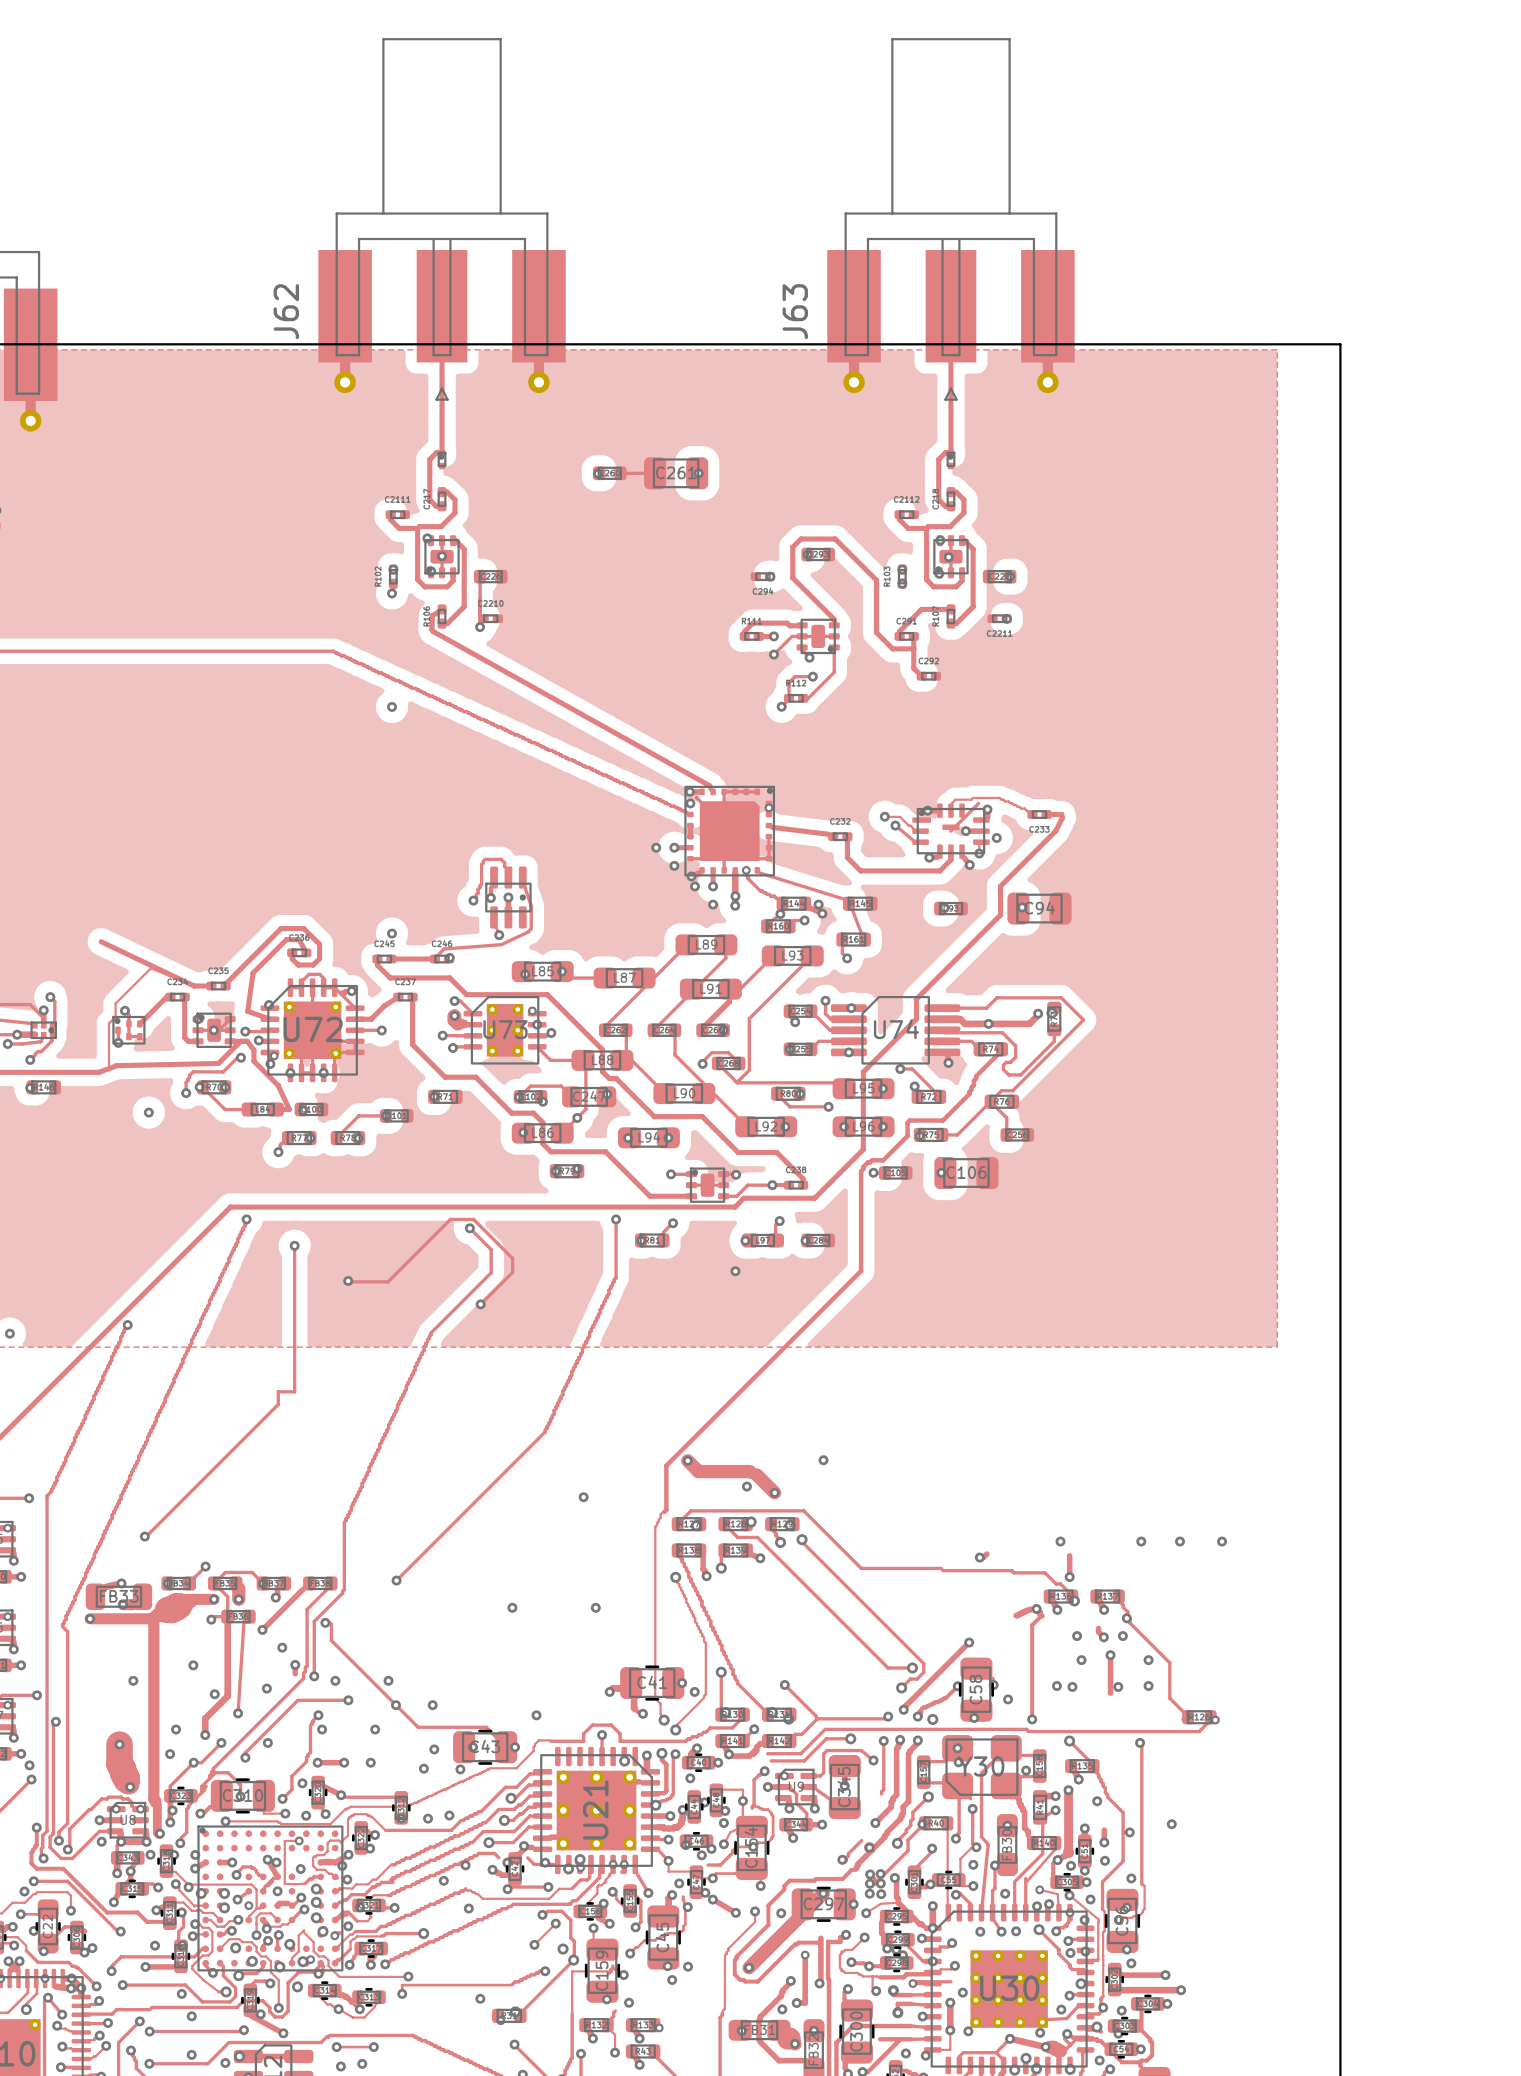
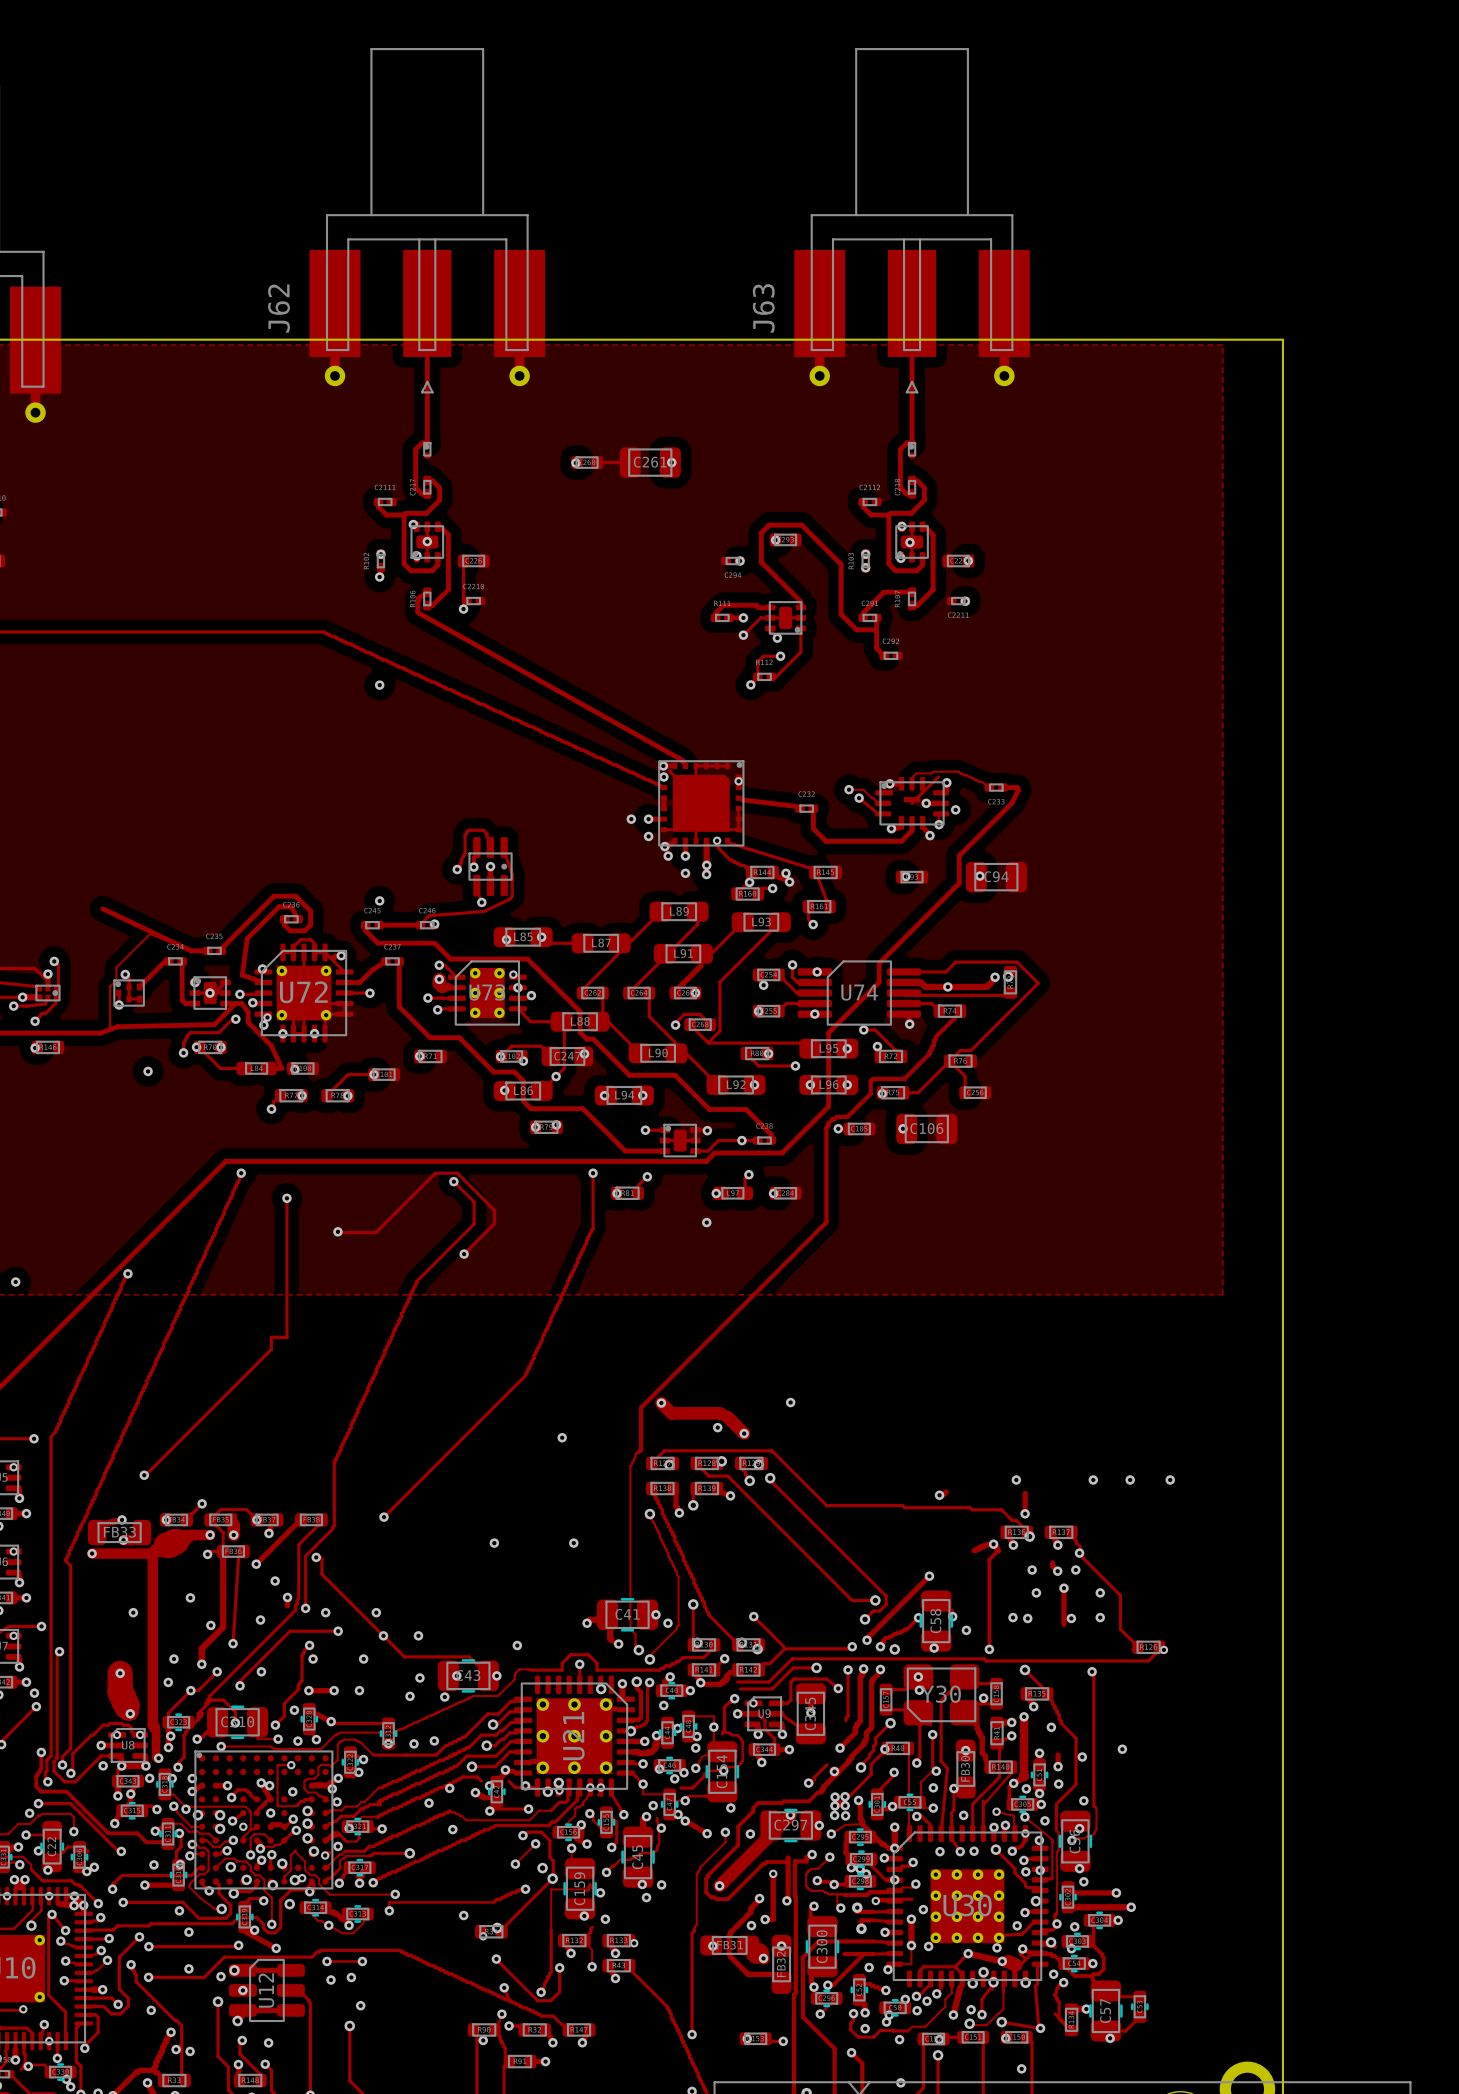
track: (1054, 1030) (1054, 1041) (1020, 1074) (1008, 1074) (1003, 1069) (1003, 1065) (1015, 1057) (1015, 1045) (1002, 1032) -> (1008, 995) (961, 995)

